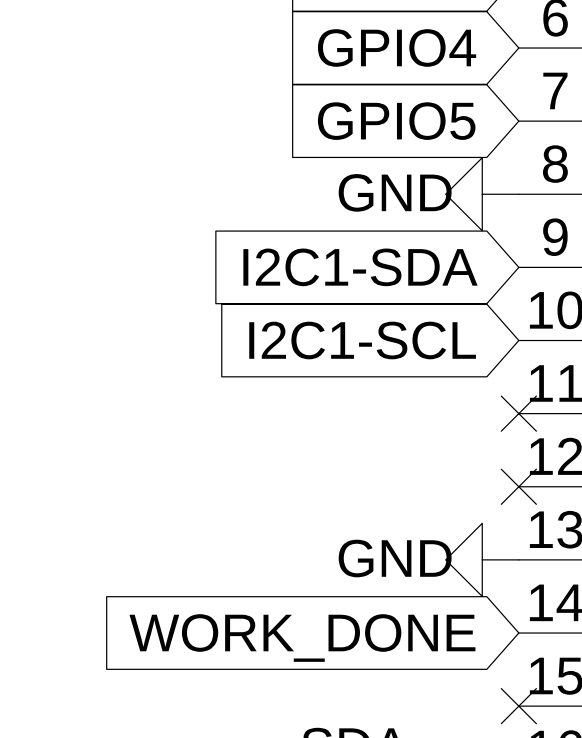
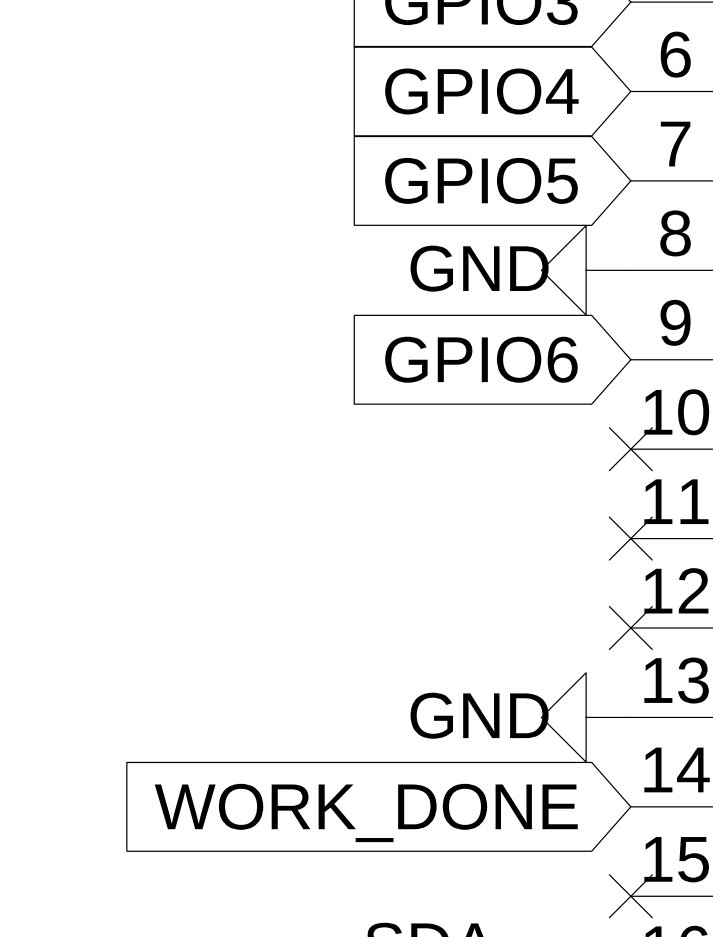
global label: I2C1-SDA (360, 267) -> GPIO6 (481, 359)
global label: I2C1-SCL (362, 340) -> none
no-connect mark: none -> (630, 449)

